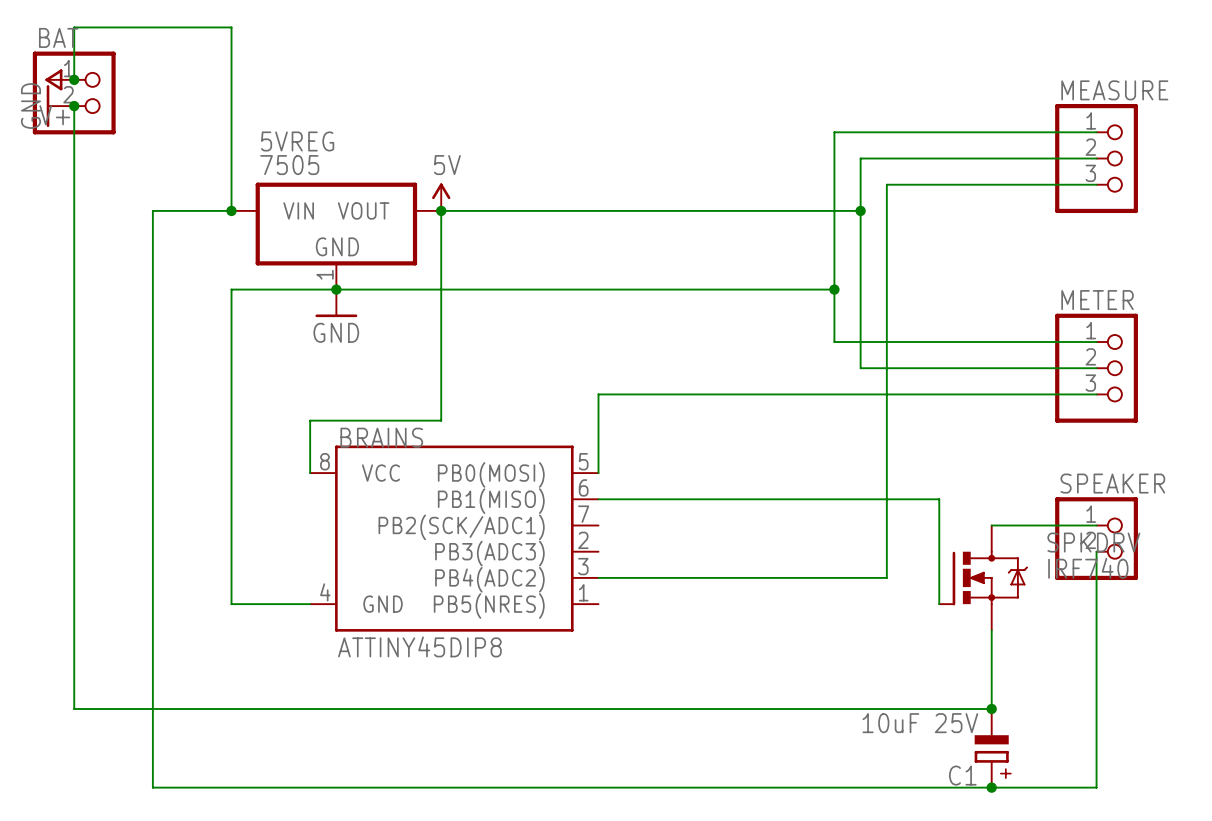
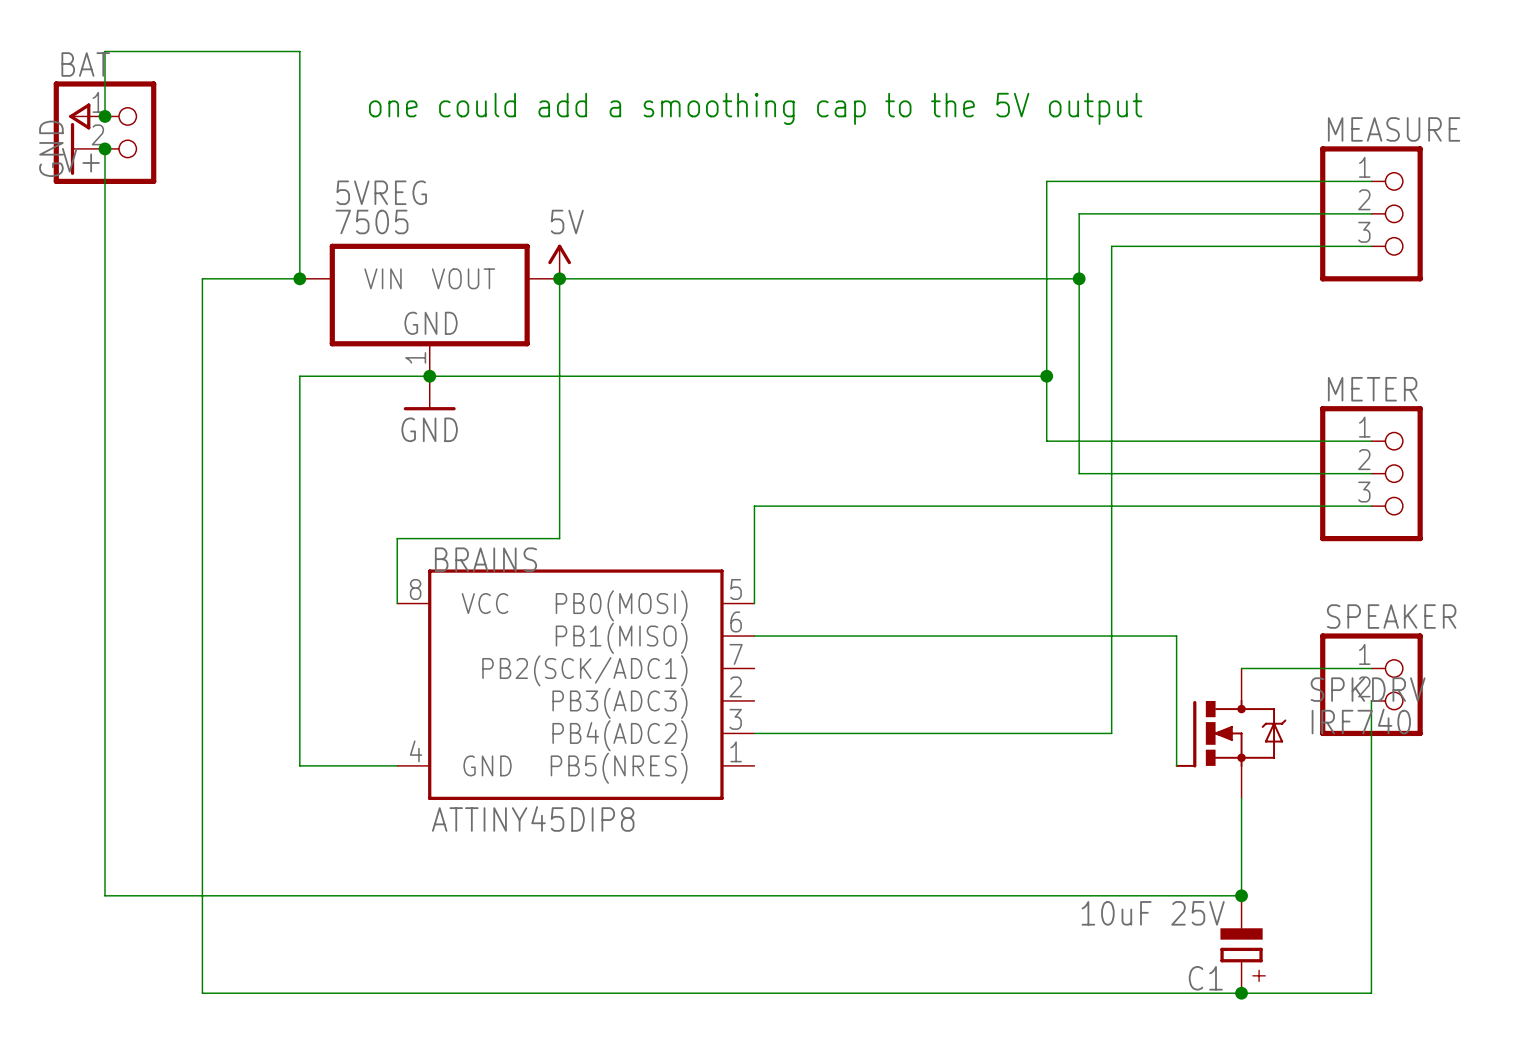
text: none -> one could add a smoothing cap to the 5V output (755, 108)

